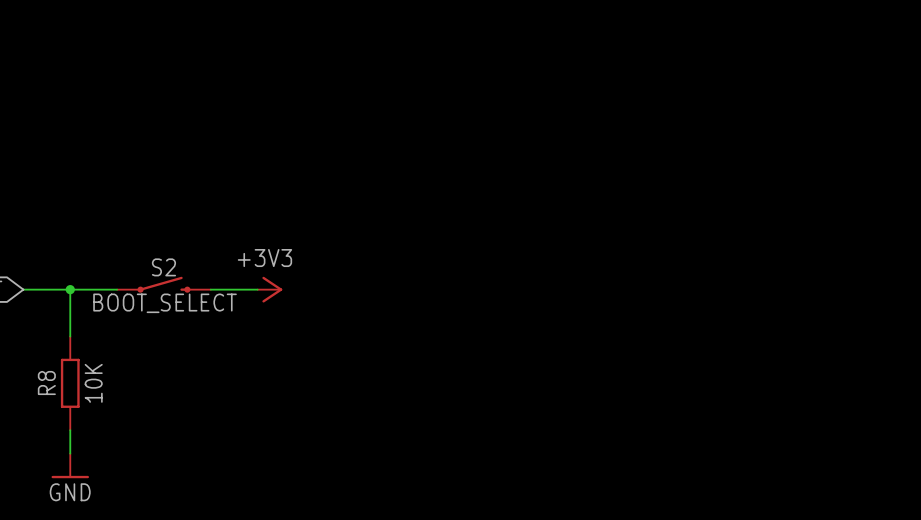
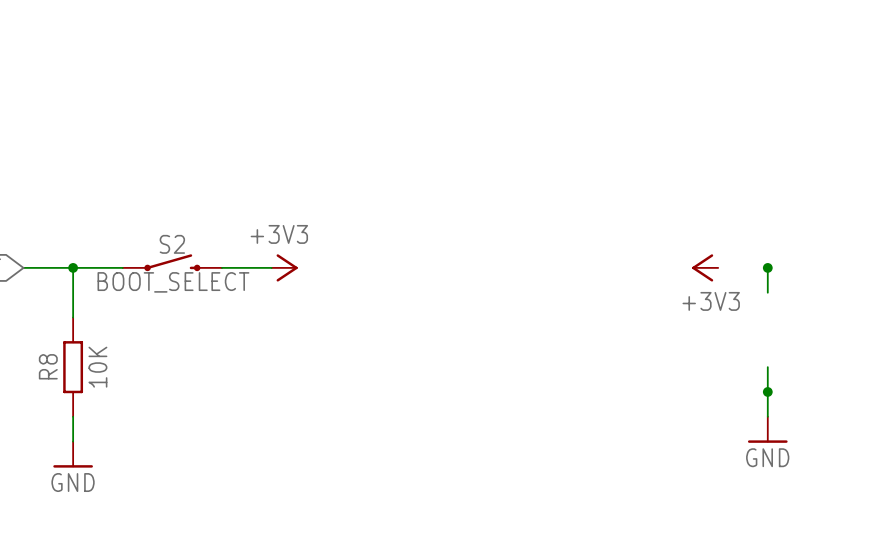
power symbol: none -> +3V3 (705, 267)
wire: none -> (767, 267) (767, 292)
junction: none -> (767, 267)
wire: none -> (767, 367) (767, 416)
junction: none -> (767, 391)
power symbol: none -> GND (767, 429)

